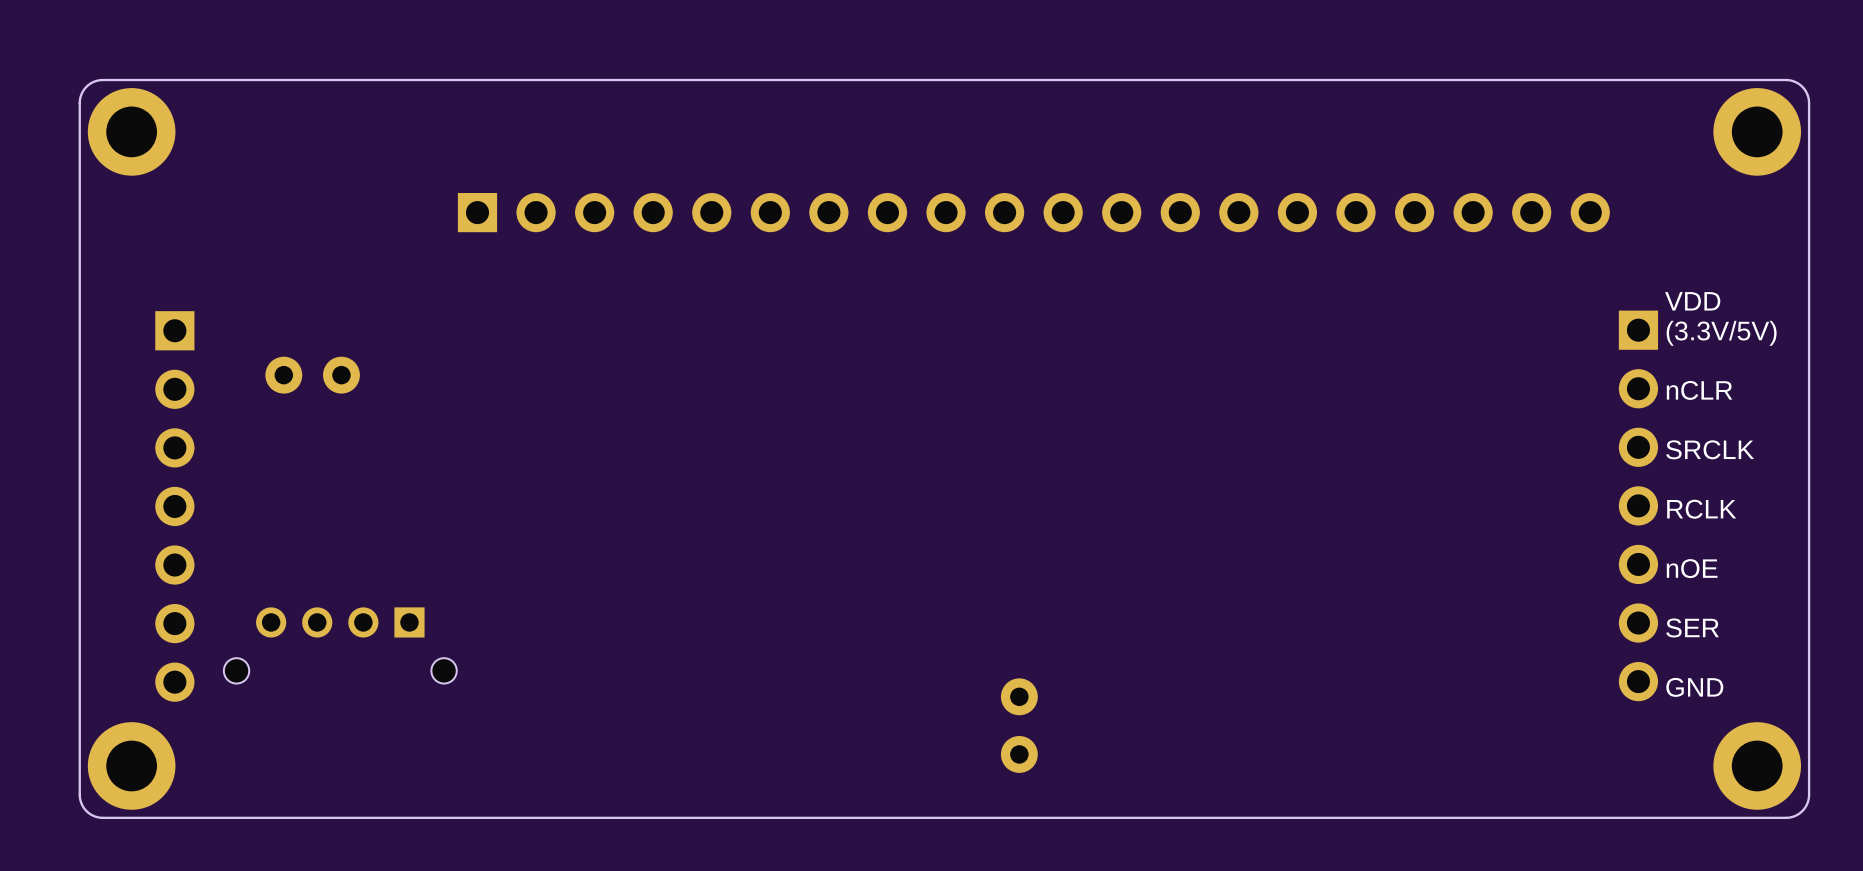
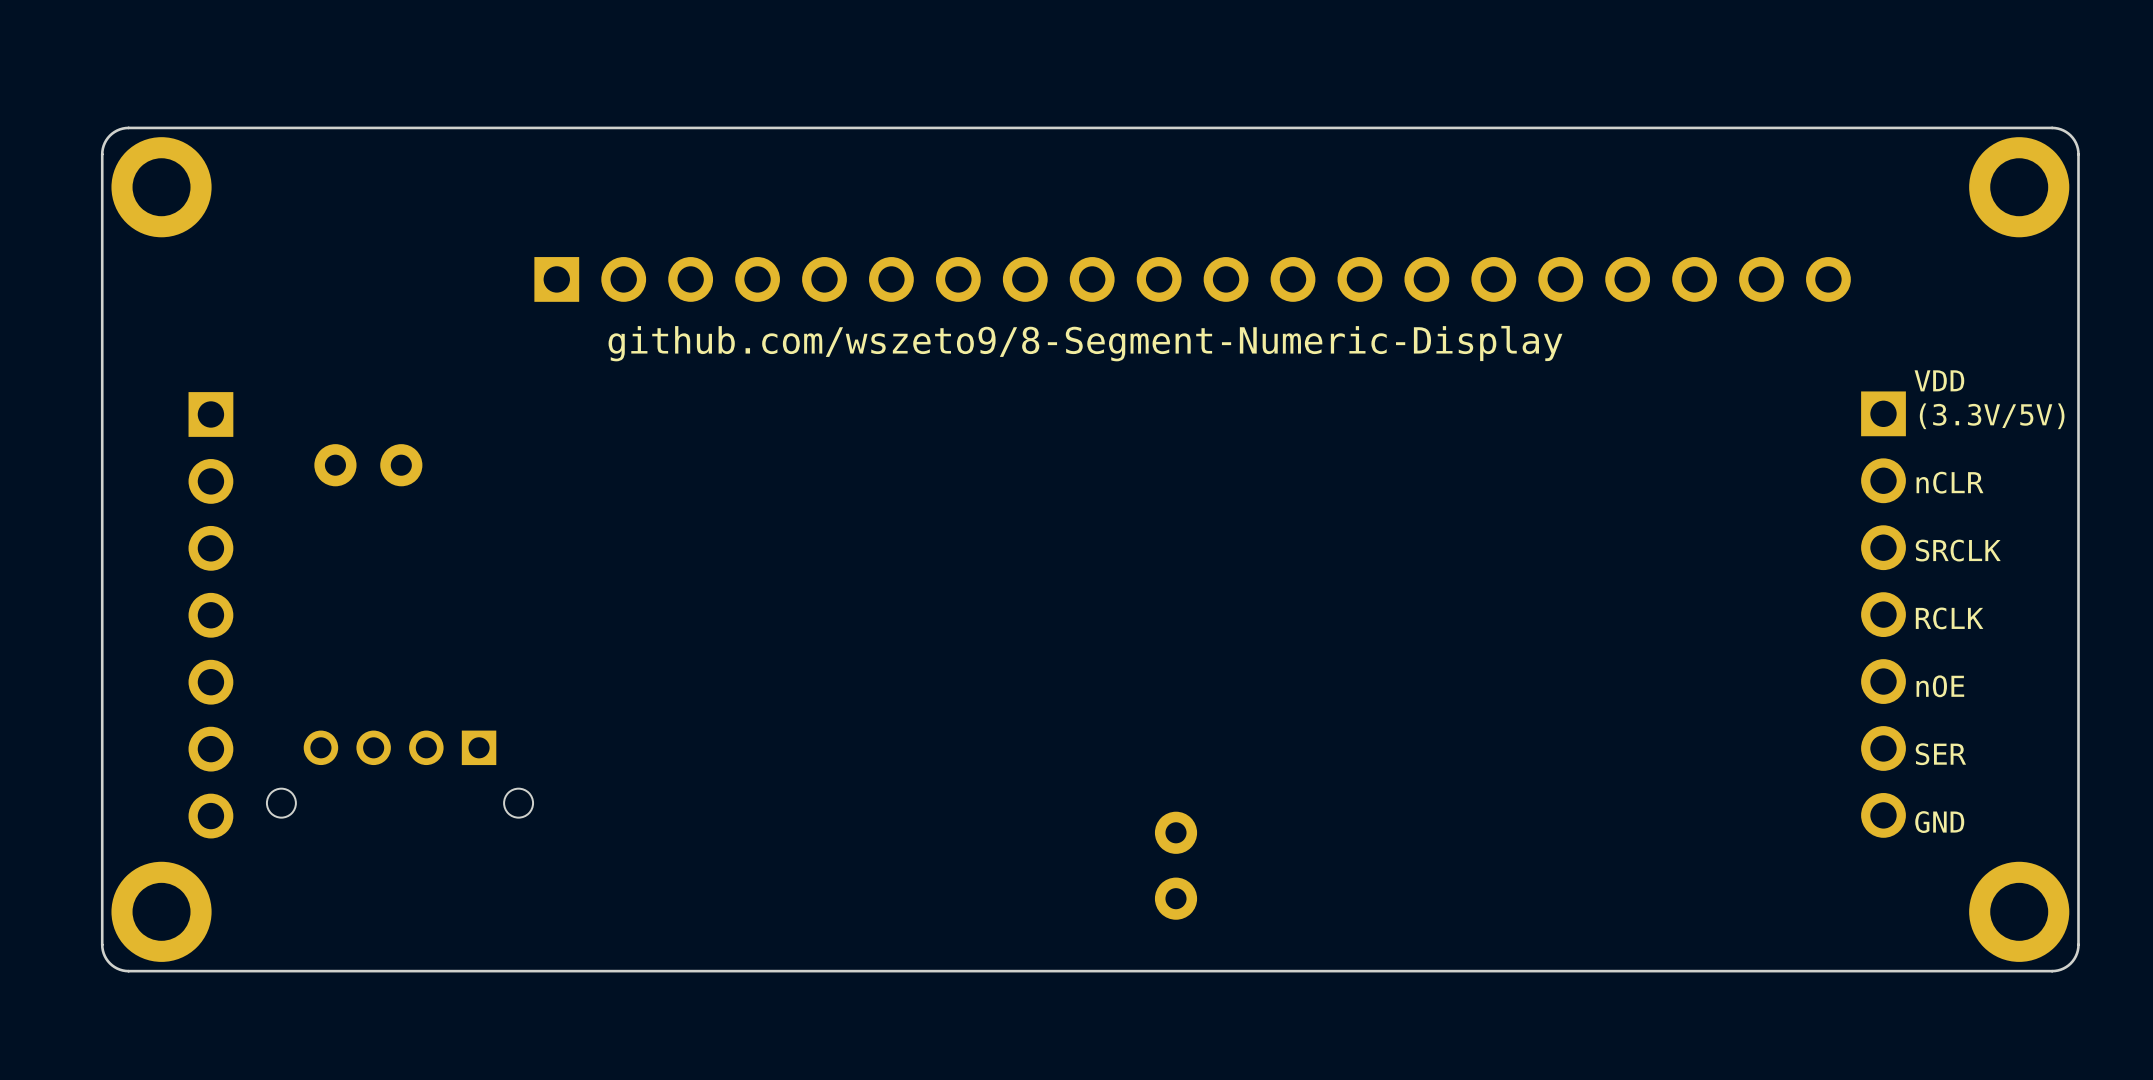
text: none -> github.com/wszeto9/8-Segment-Numeric-Display (1085, 343)

